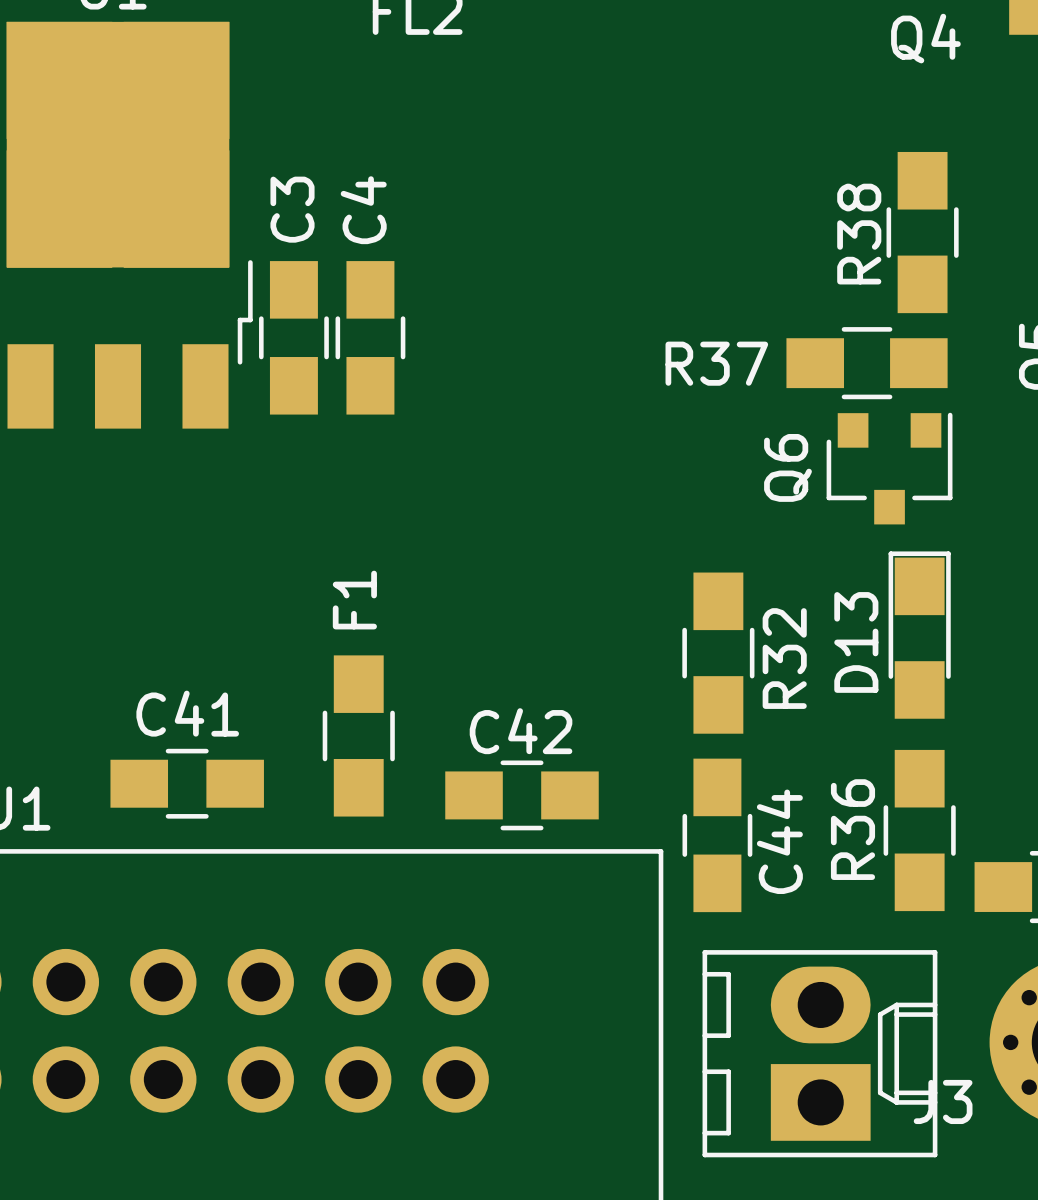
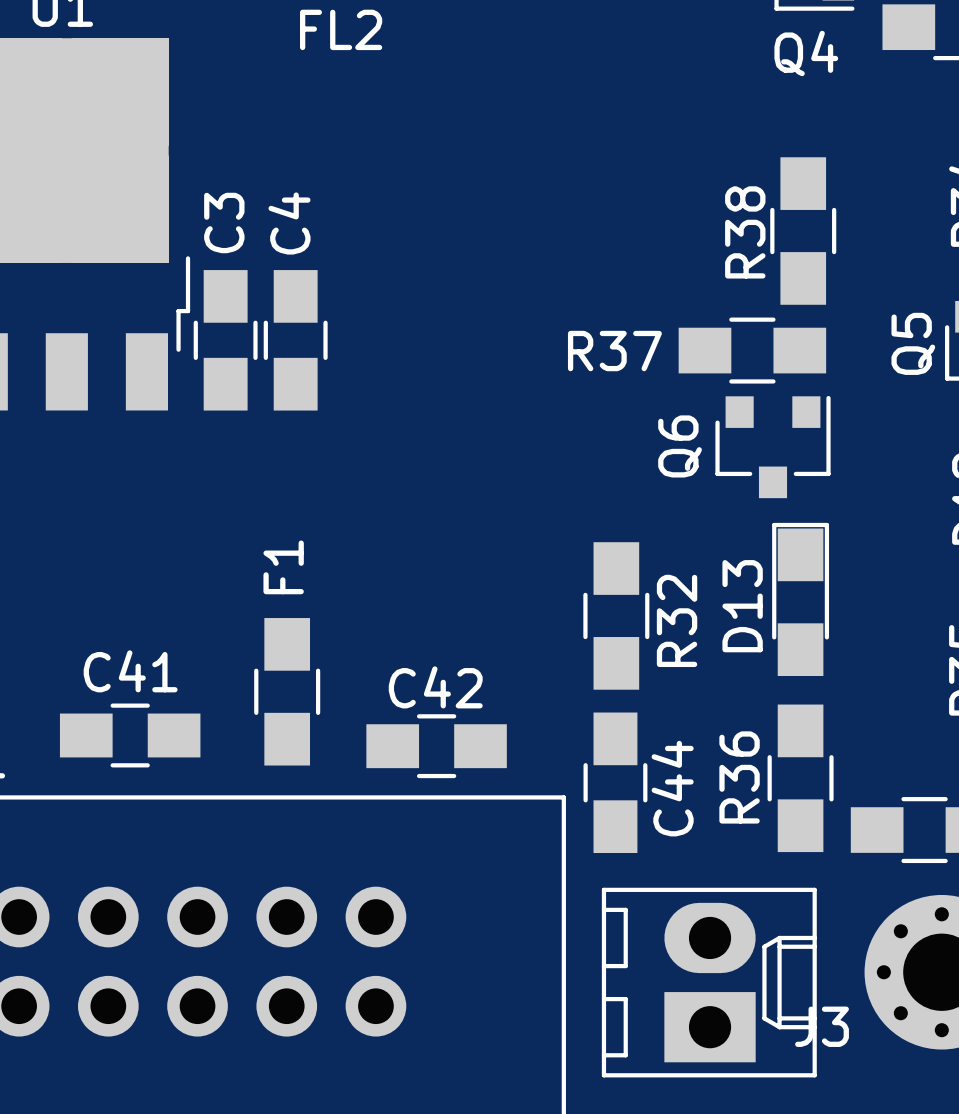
C3 position: (293, 337) -> (225, 340)
C4 position: (370, 337) -> (295, 340)

